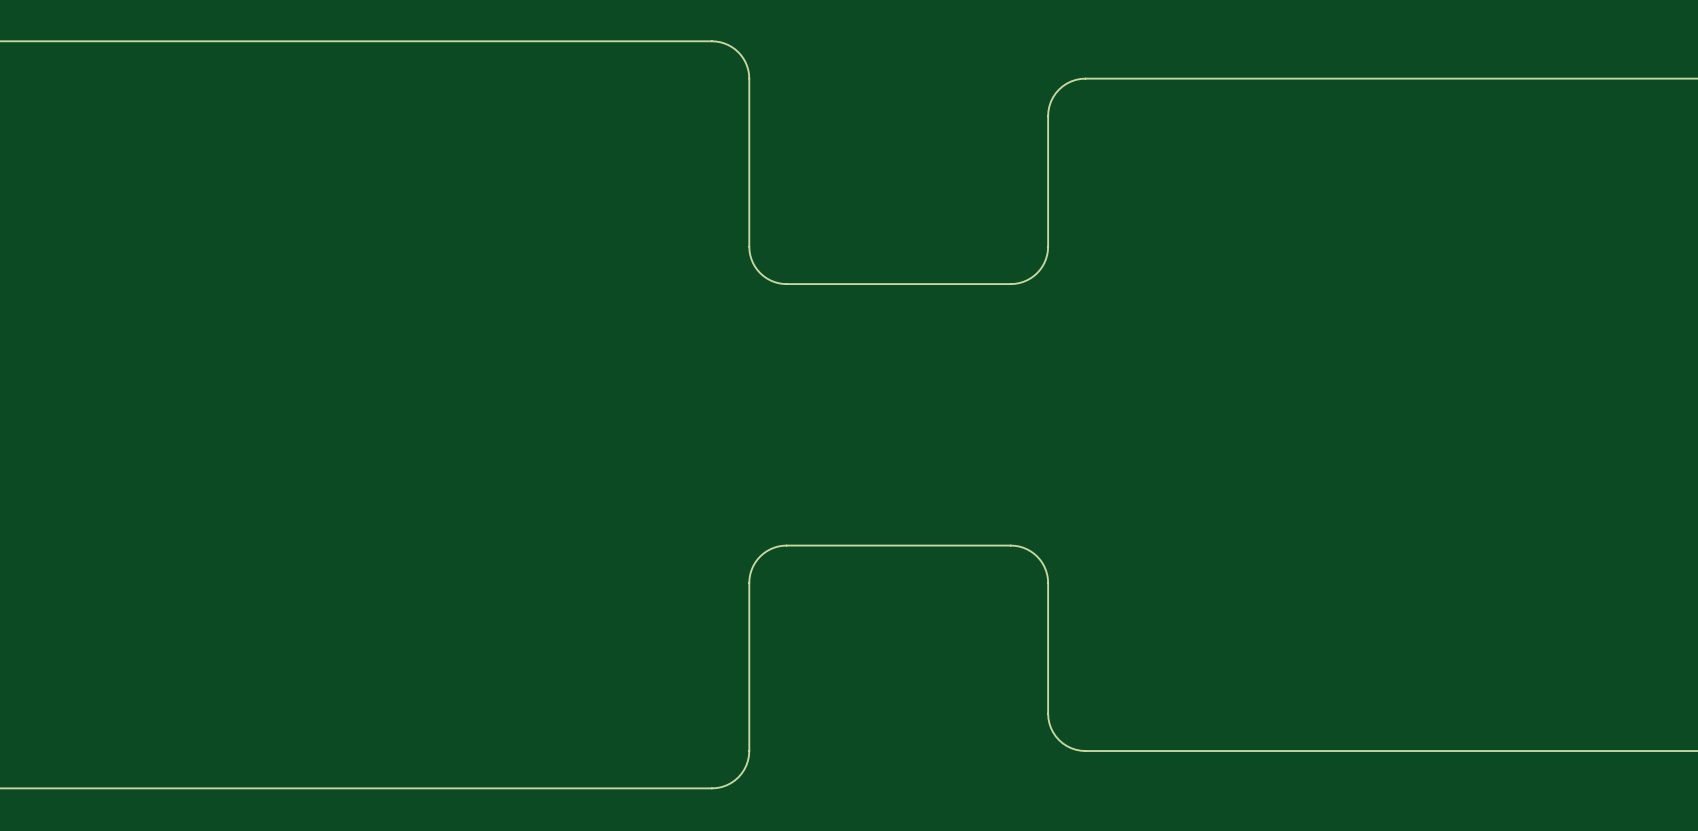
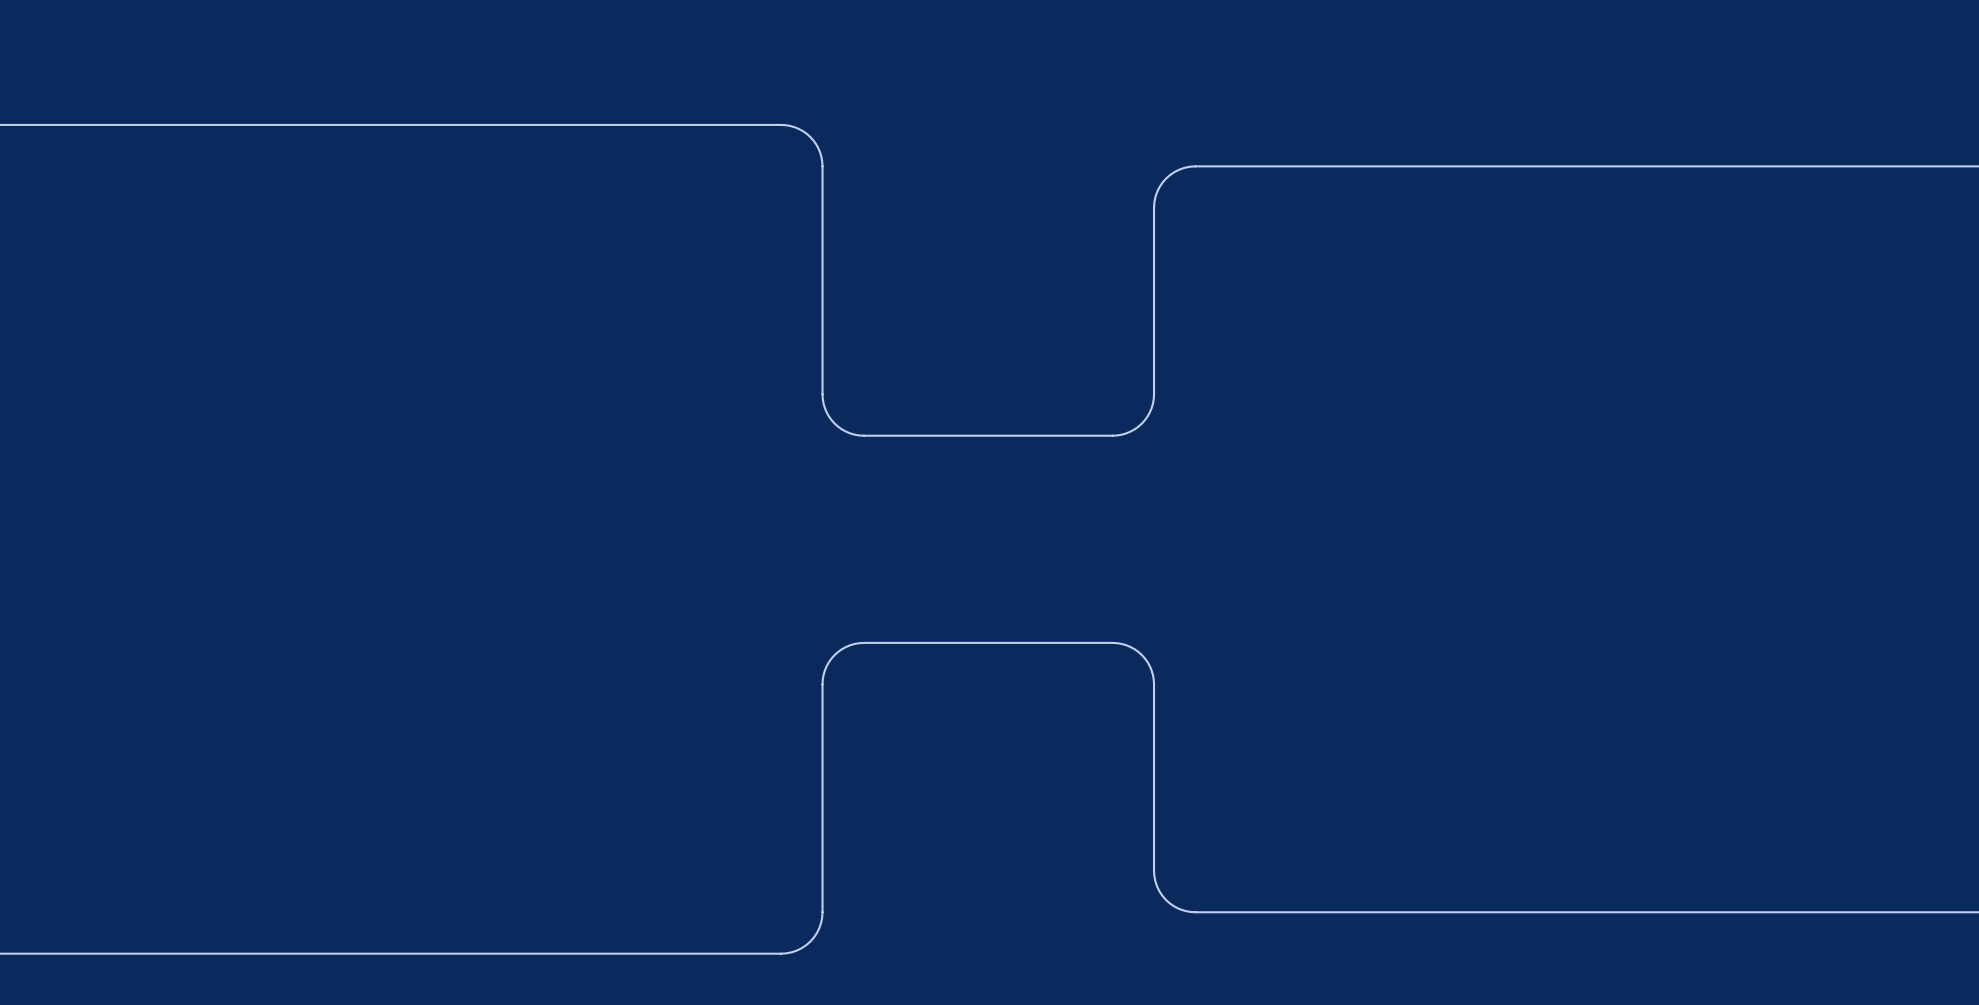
board edge: (1048, 246) (1046, 259) (1037, 273) (1023, 281) (1010, 284) (782, 283) (766, 278) (757, 270) (751, 259) (749, 246) -> (1154, 352) (1153, 398) (1149, 412) (1141, 423) (1134, 429) (1126, 433) (1112, 435) (854, 434) (845, 431) (834, 423) (824, 407) (822, 394) (822, 352)
board edge: (1048, 582) (1046, 570) (1037, 556) (1023, 547) (1010, 545) (782, 545) (770, 549) (757, 559) (751, 570) (749, 582) -> (1154, 725) (1153, 679) (1149, 666) (1144, 658) (1134, 649) (1121, 643) (1112, 642) (854, 643) (838, 651) (831, 658) (824, 670) (822, 684) (822, 725)

